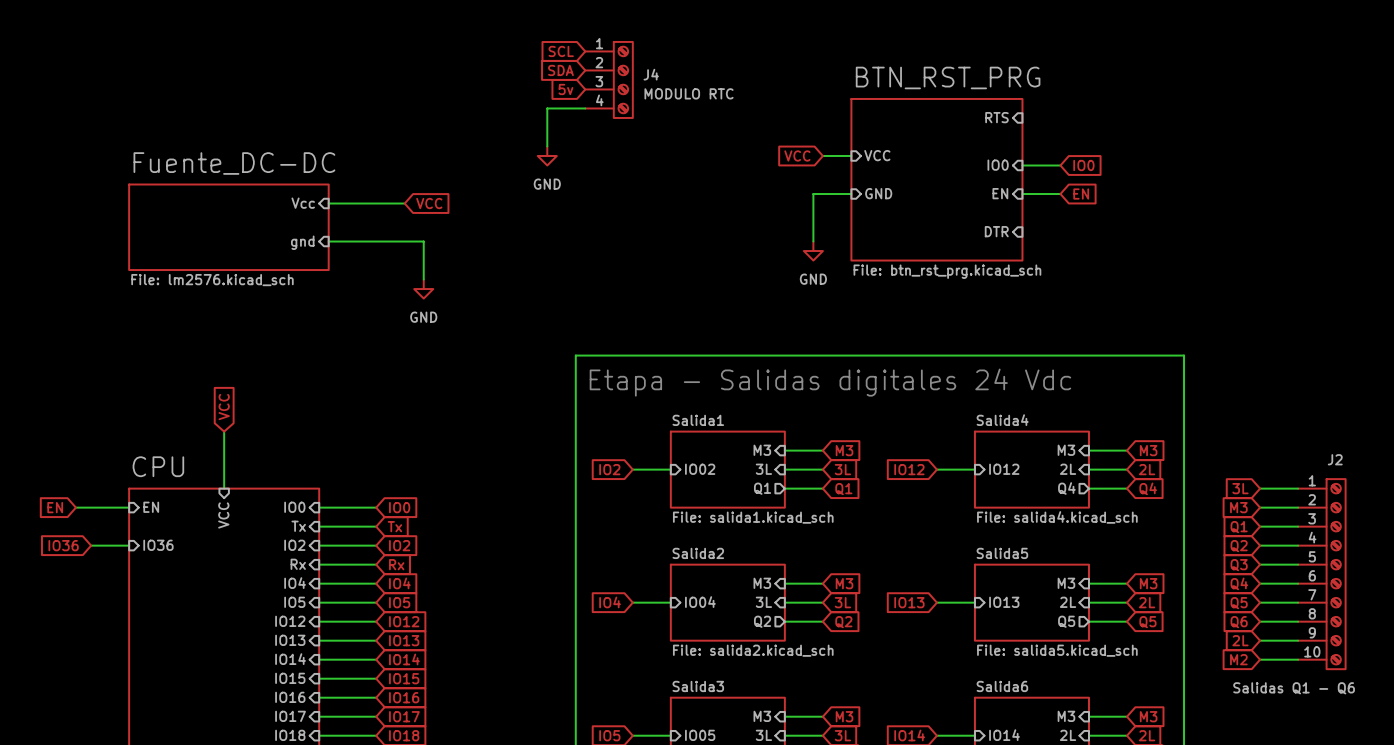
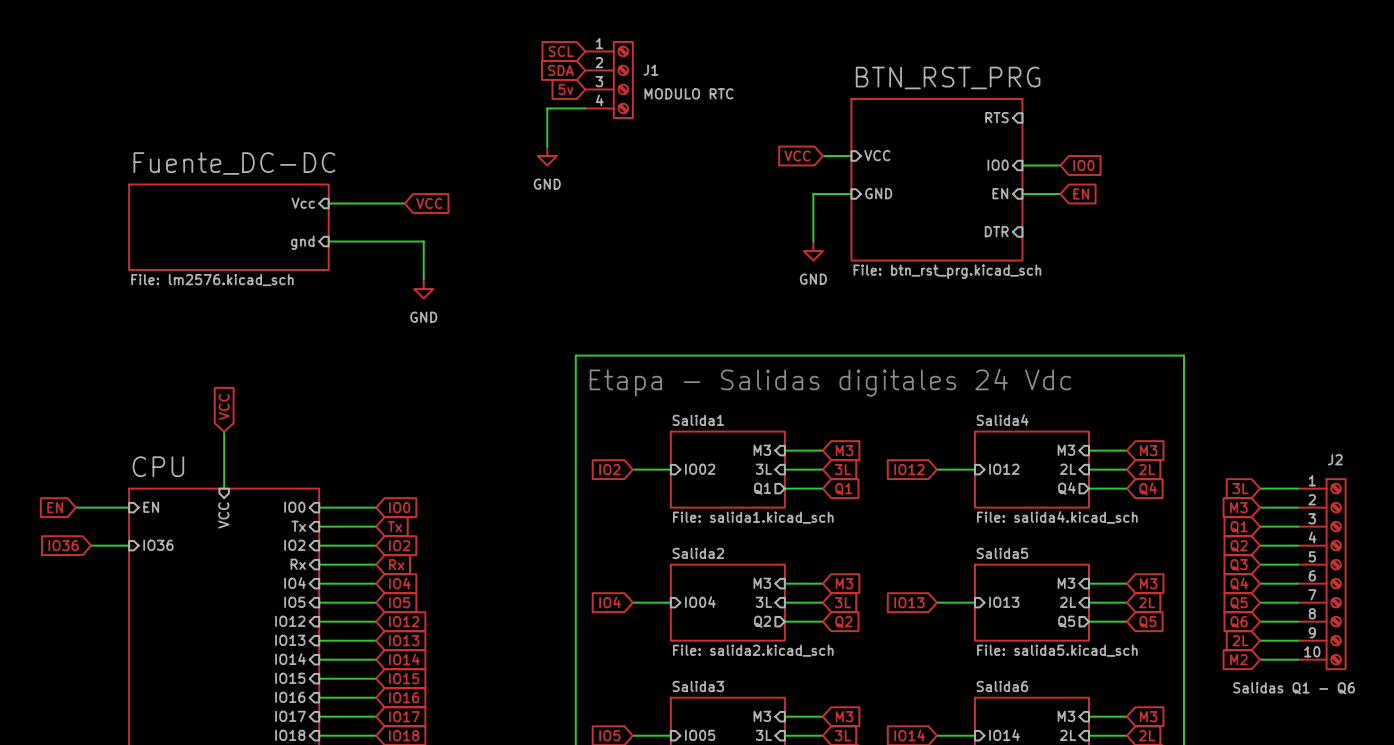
J4 name: J4 (651, 74) -> J1 (650, 70)

